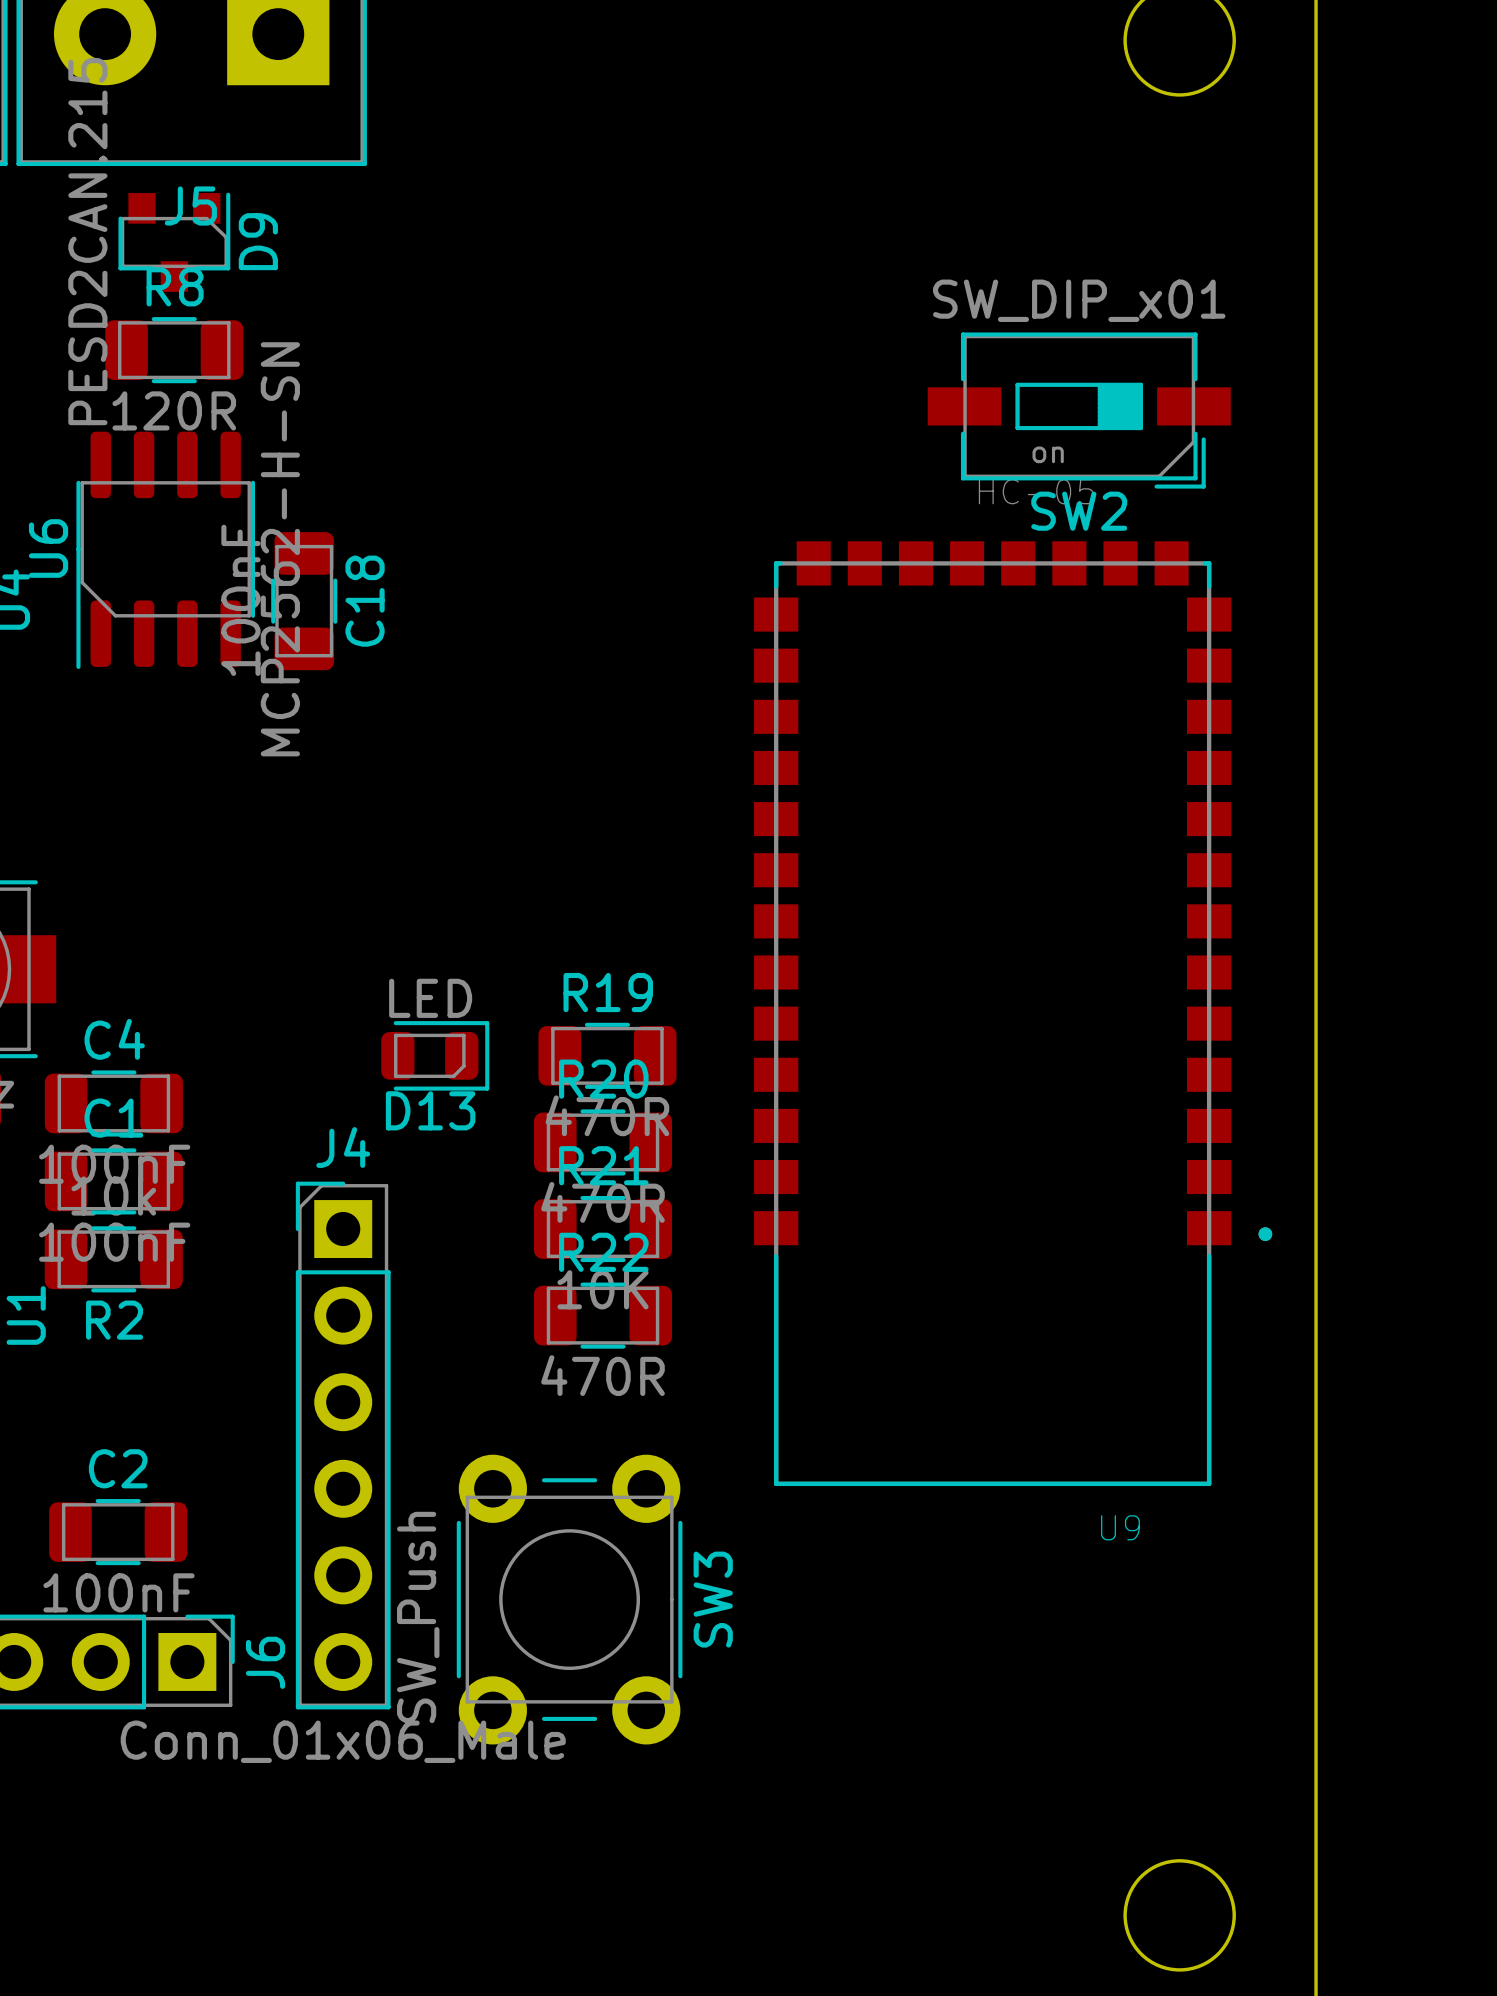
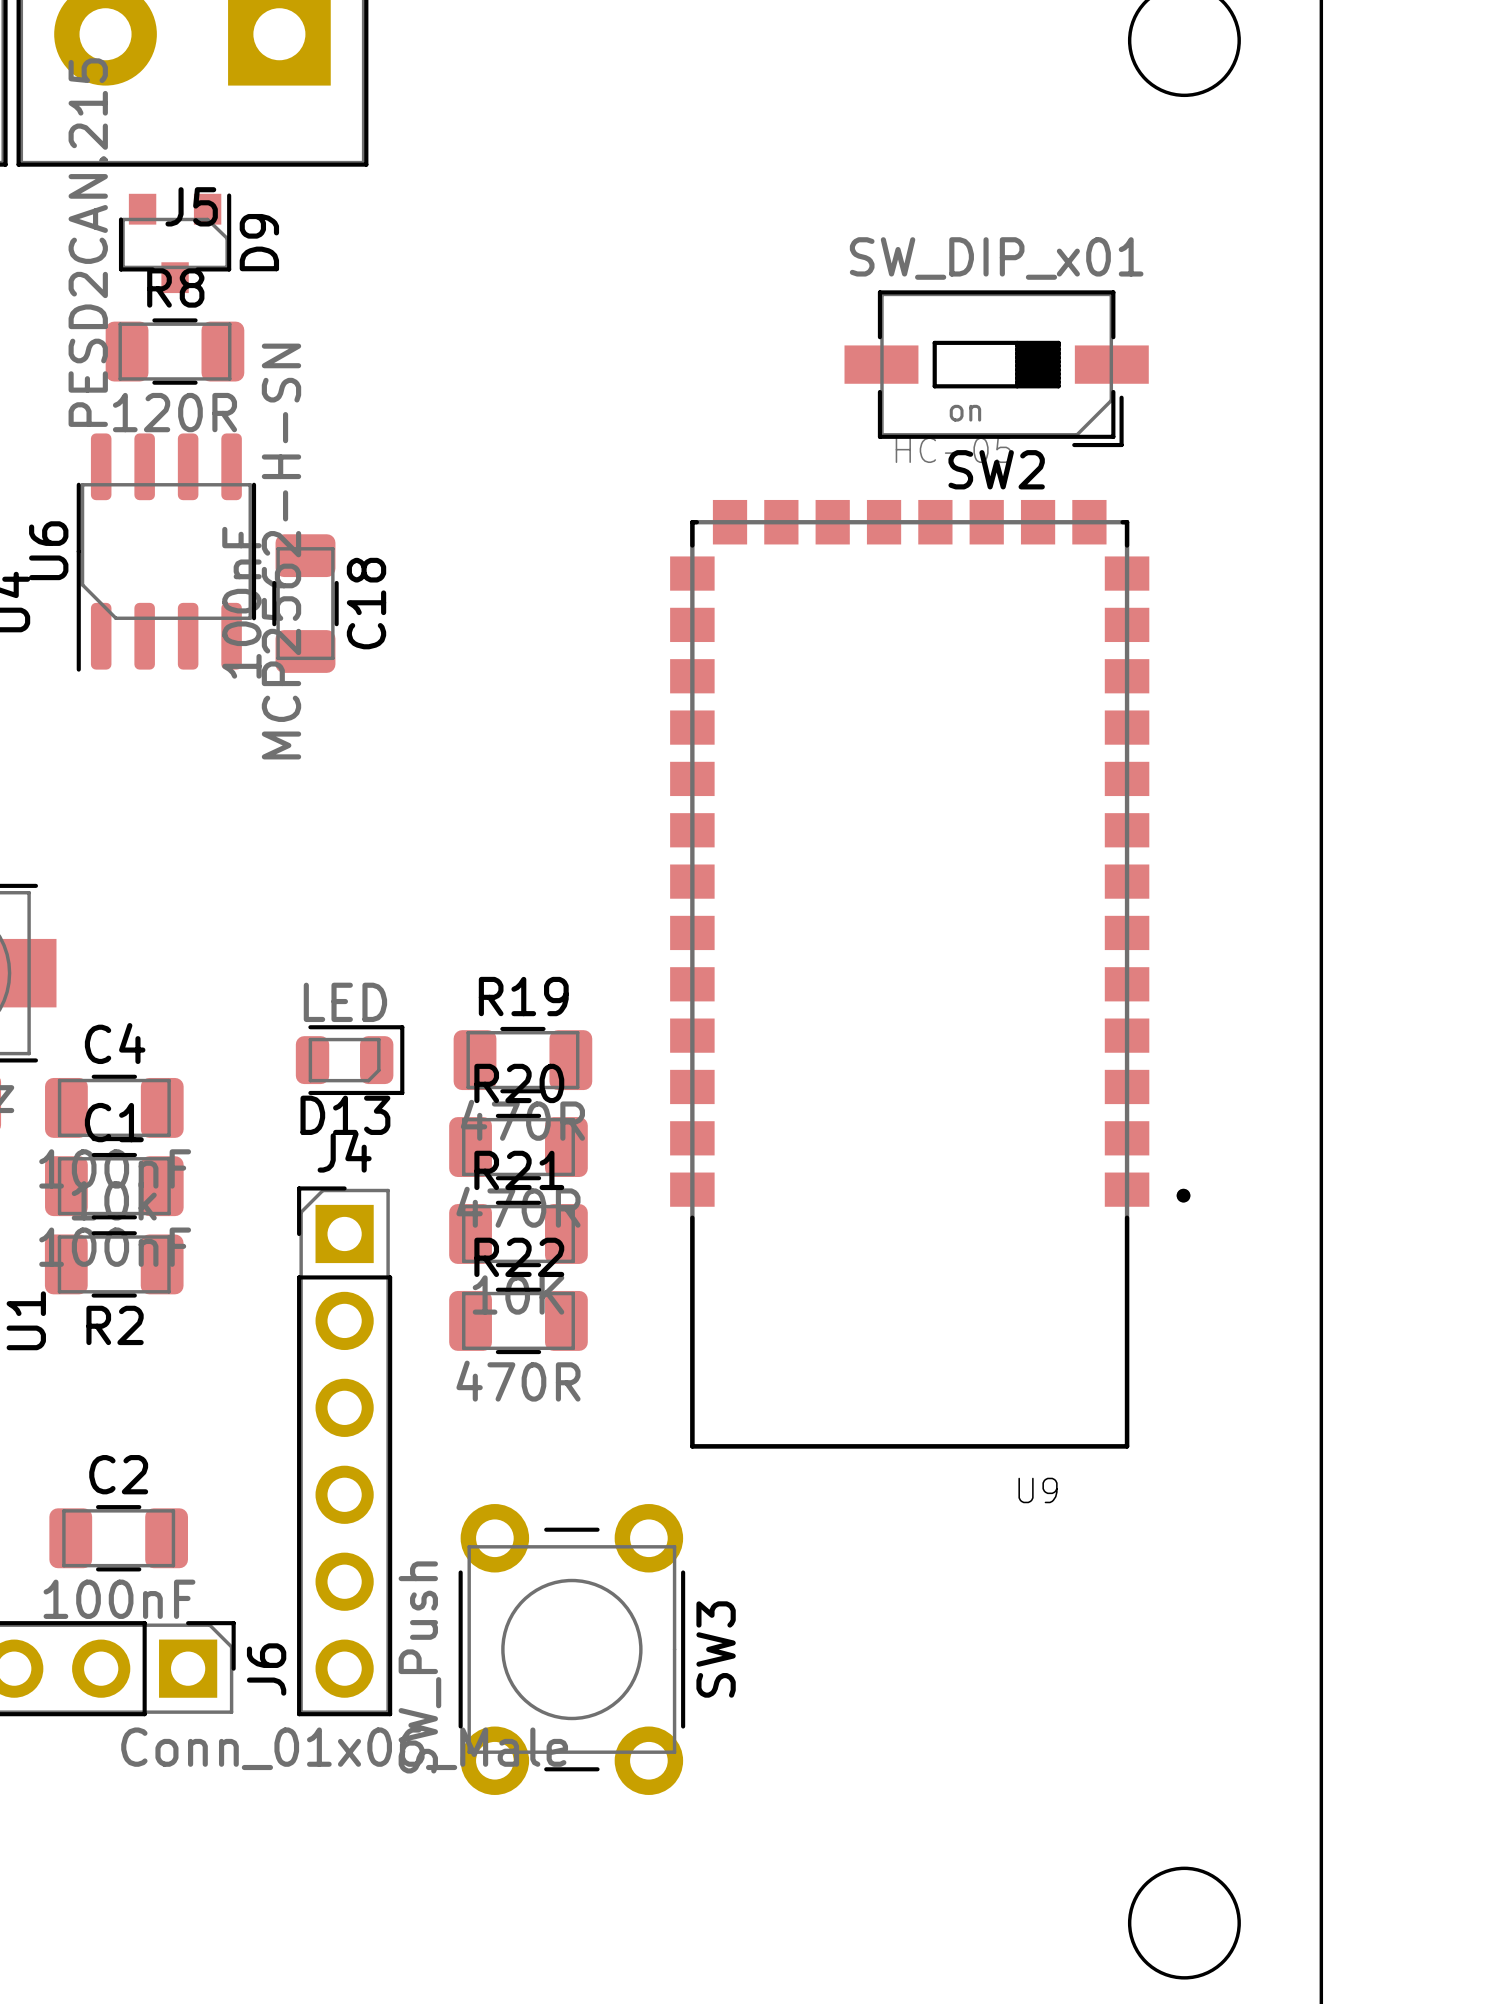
SW2 position: (1079, 410) -> (996, 368)
U9 position: (1013, 1013) -> (930, 974)
D13 position: (435, 1055) -> (350, 1060)
R19 position: (607, 1055) -> (522, 1060)
R20 position: (603, 1142) -> (518, 1147)
R21 position: (603, 1229) -> (518, 1233)
R22 position: (603, 1315) -> (518, 1320)
SW3 position: (569, 1599) -> (571, 1649)

